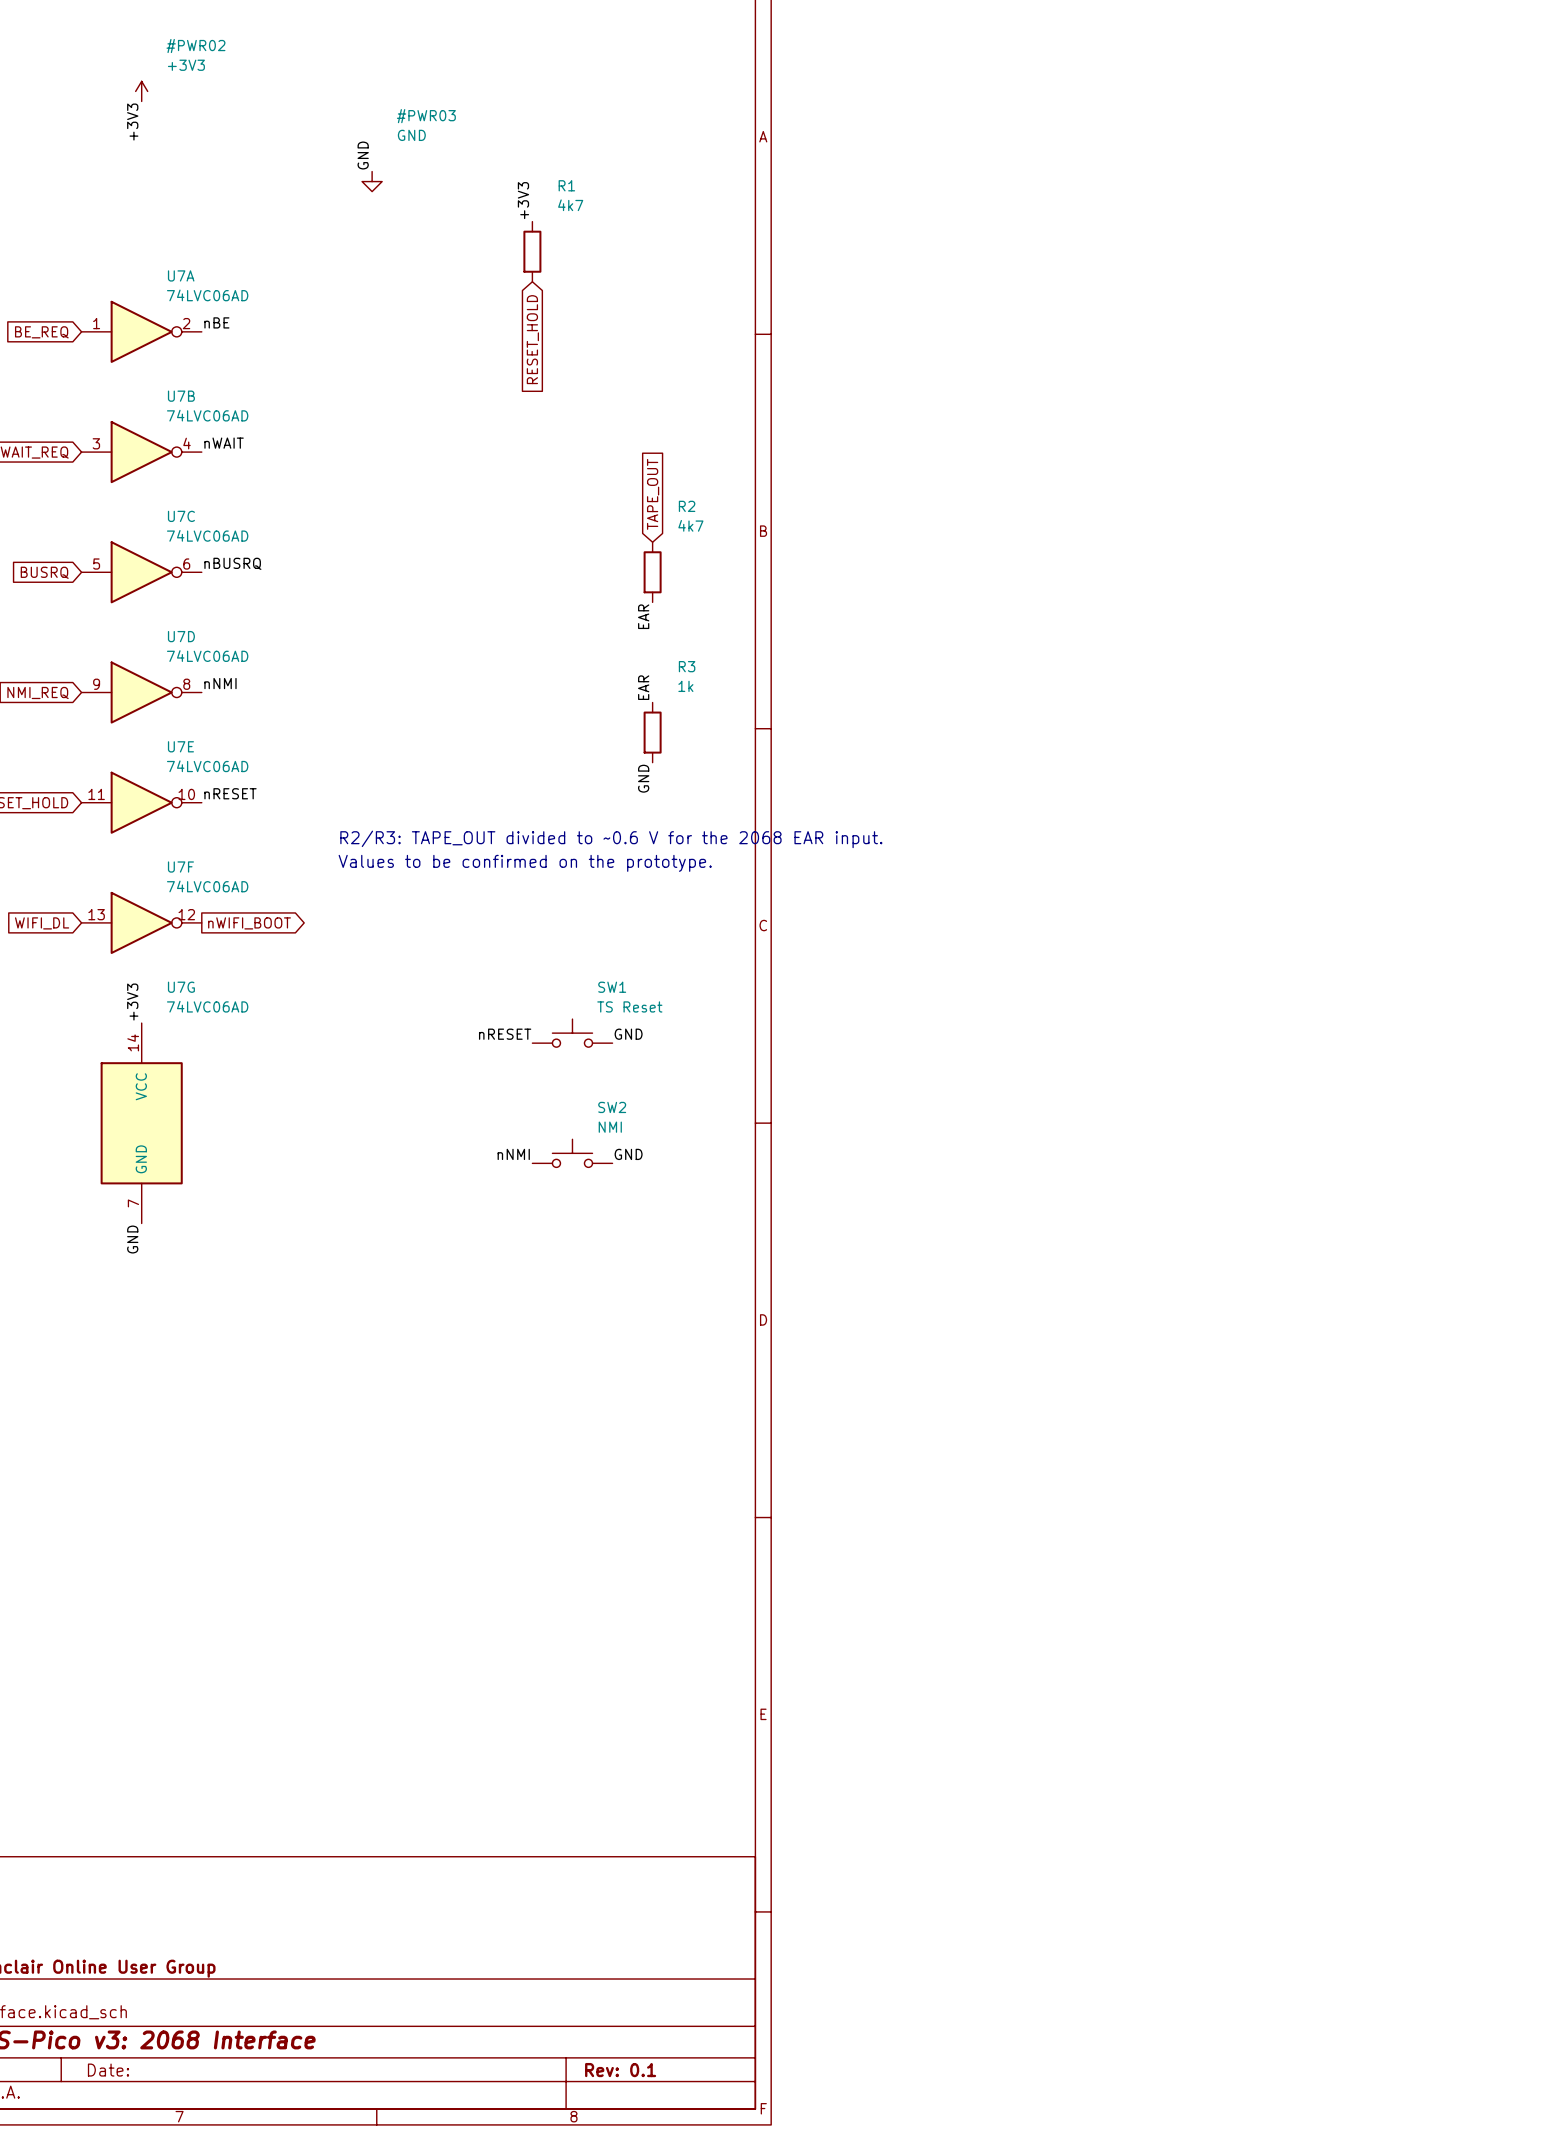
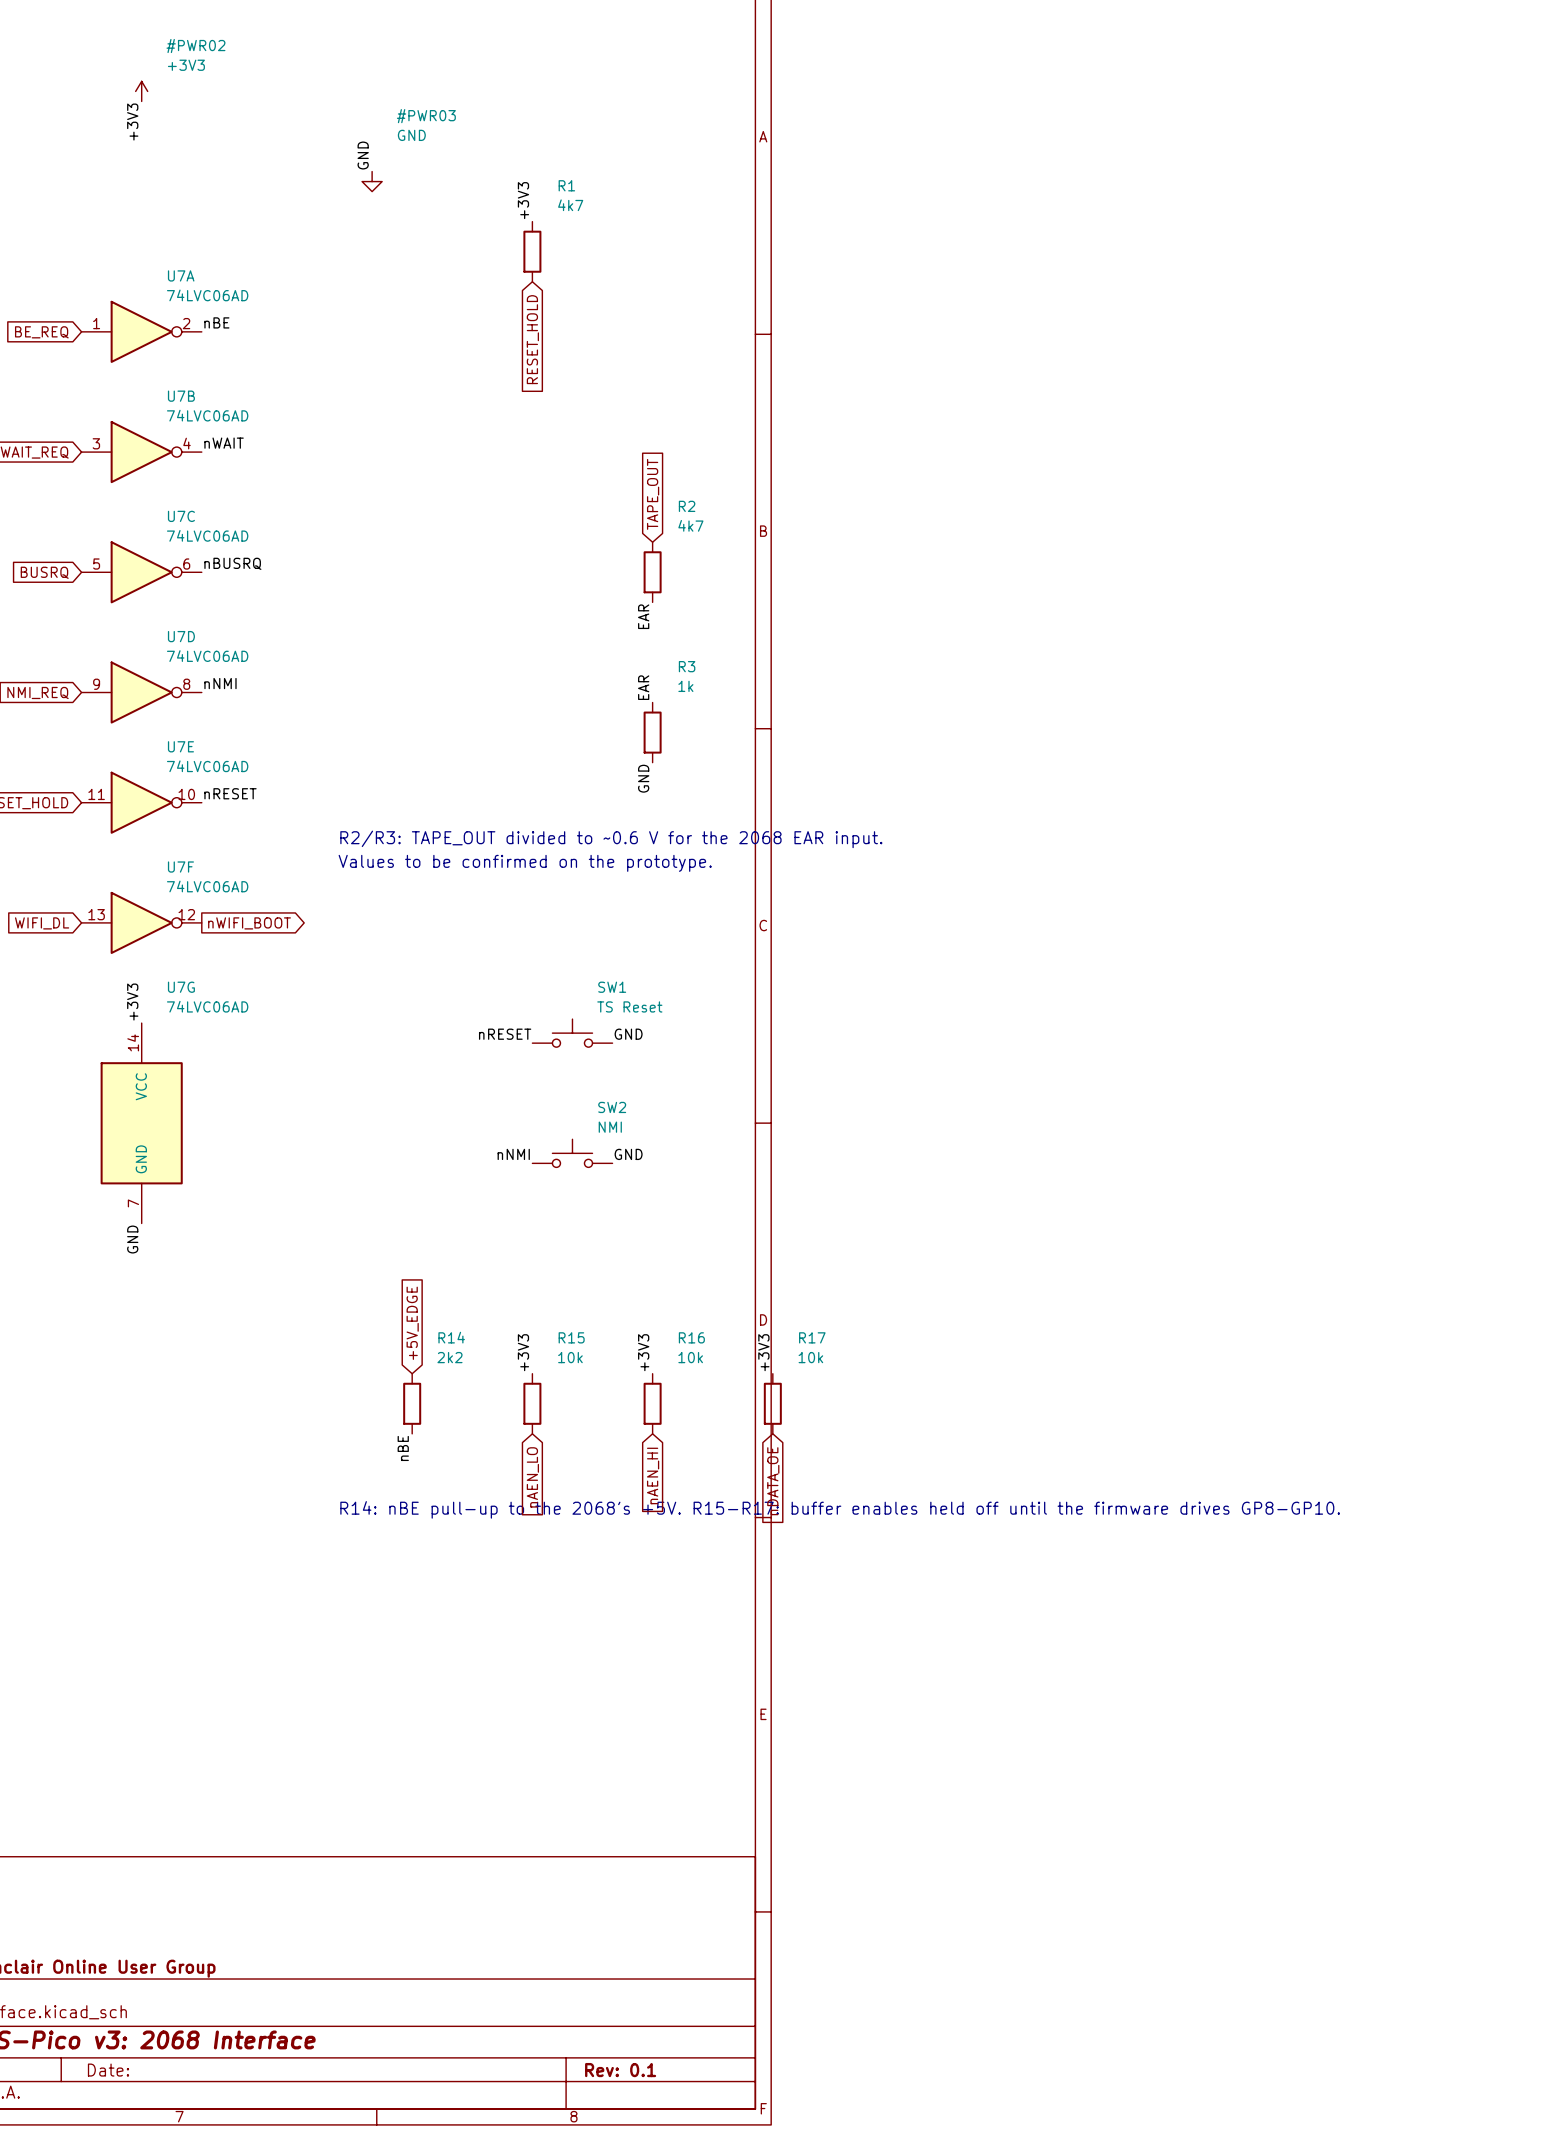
global label: none -> +5V_EDGE (412, 1323)
label: none -> +3V3 (523, 1352)
label: none -> +3V3 (643, 1352)
label: none -> +3V3 (763, 1352)
R14: none -> 2k2 (412, 1403)
R15: none -> 10k (532, 1403)
R16: none -> 10k (652, 1403)
R17: none -> 10k (772, 1403)
label: none -> nBE (403, 1448)
global label: none -> nAEN_HI (653, 1475)
global label: none -> nAEN_LO (532, 1477)
global label: none -> nDATA_OE (773, 1481)
text: none -> R14: nBE pull-up to the 2068's +5V. R15-R17: buffer enables held off until the firmware drives GP8-GP10. (840, 1509)

